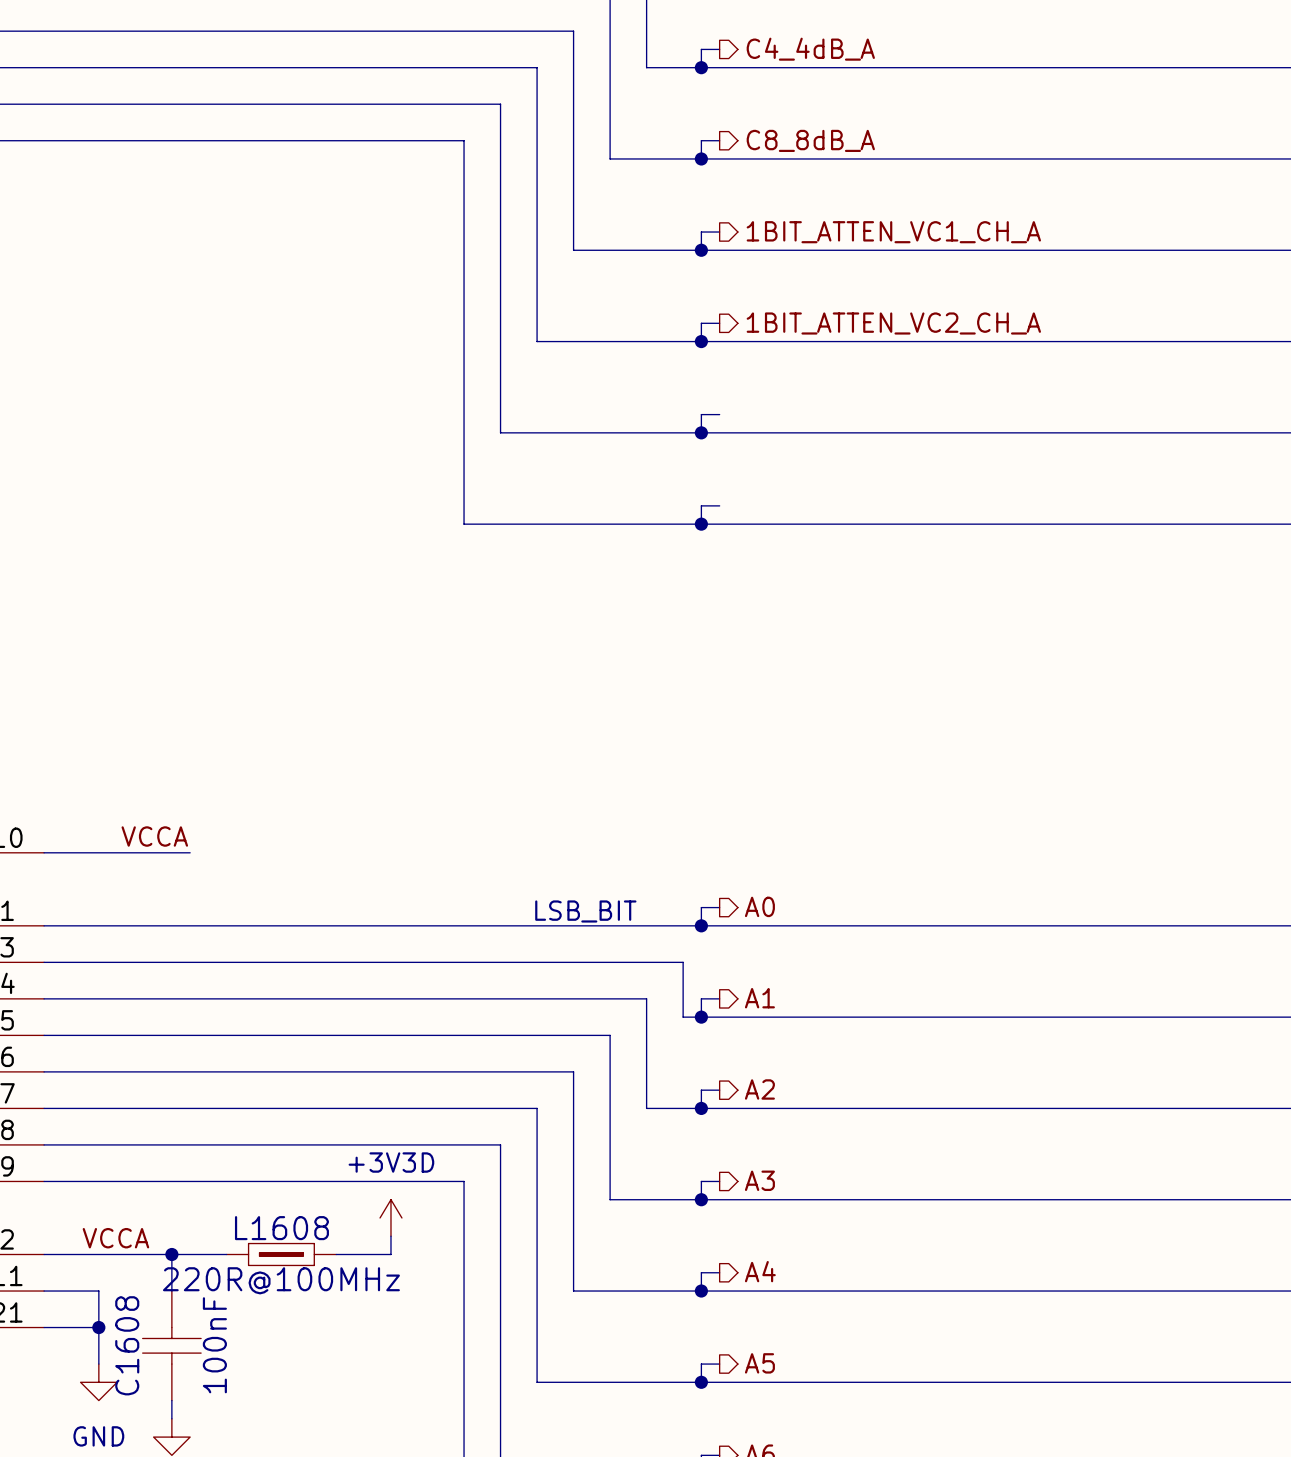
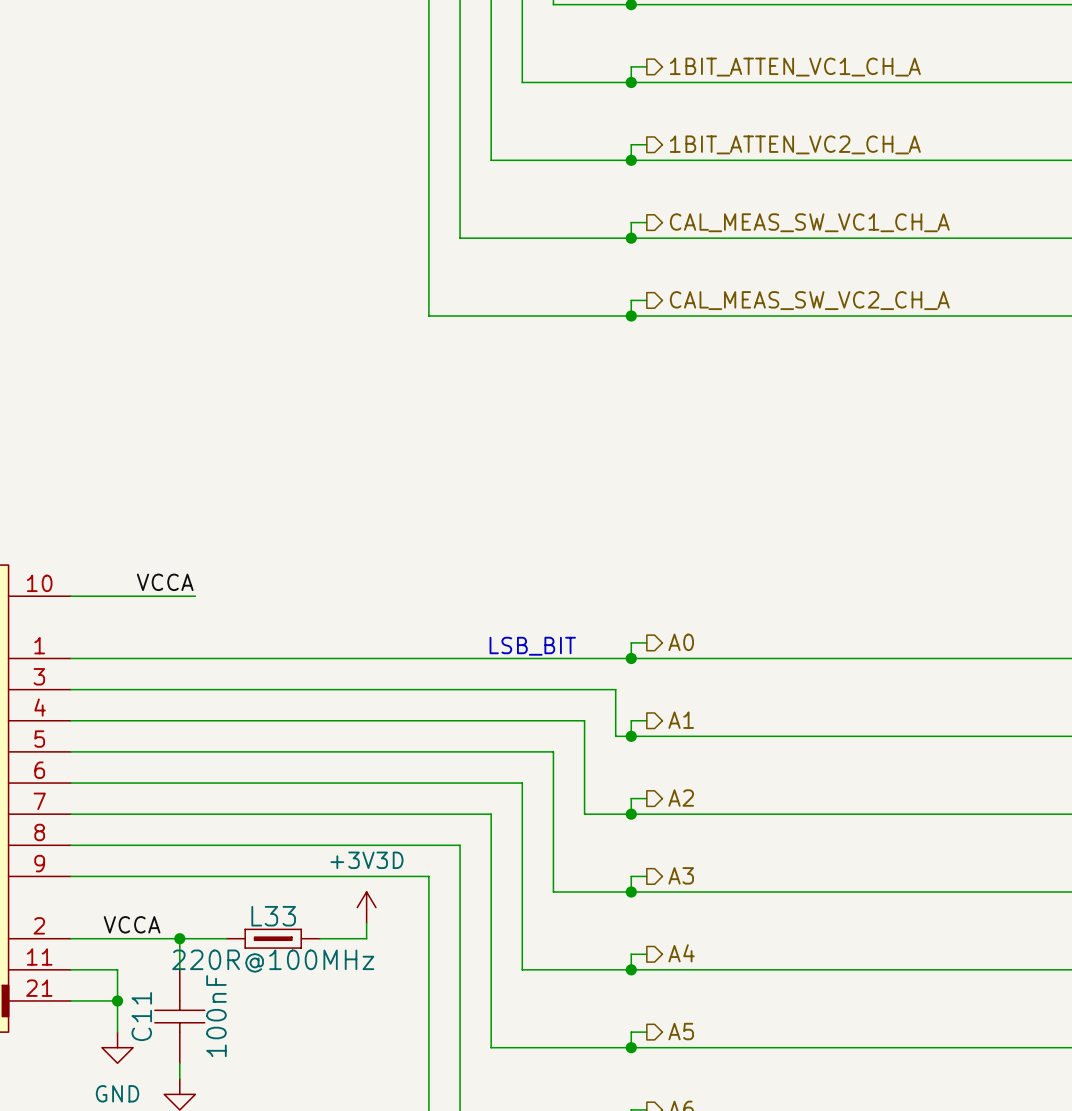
hierarchical label: none -> CAL_MEAS_SW_VC1_CH_A (809, 222)
hierarchical label: none -> CAL_MEAS_SW_VC2_CH_A (809, 300)
L1608 name: L1608 (281, 1228) -> L33 (273, 916)
C1608 name: C1608 (127, 1345) -> C11 (141, 1016)

